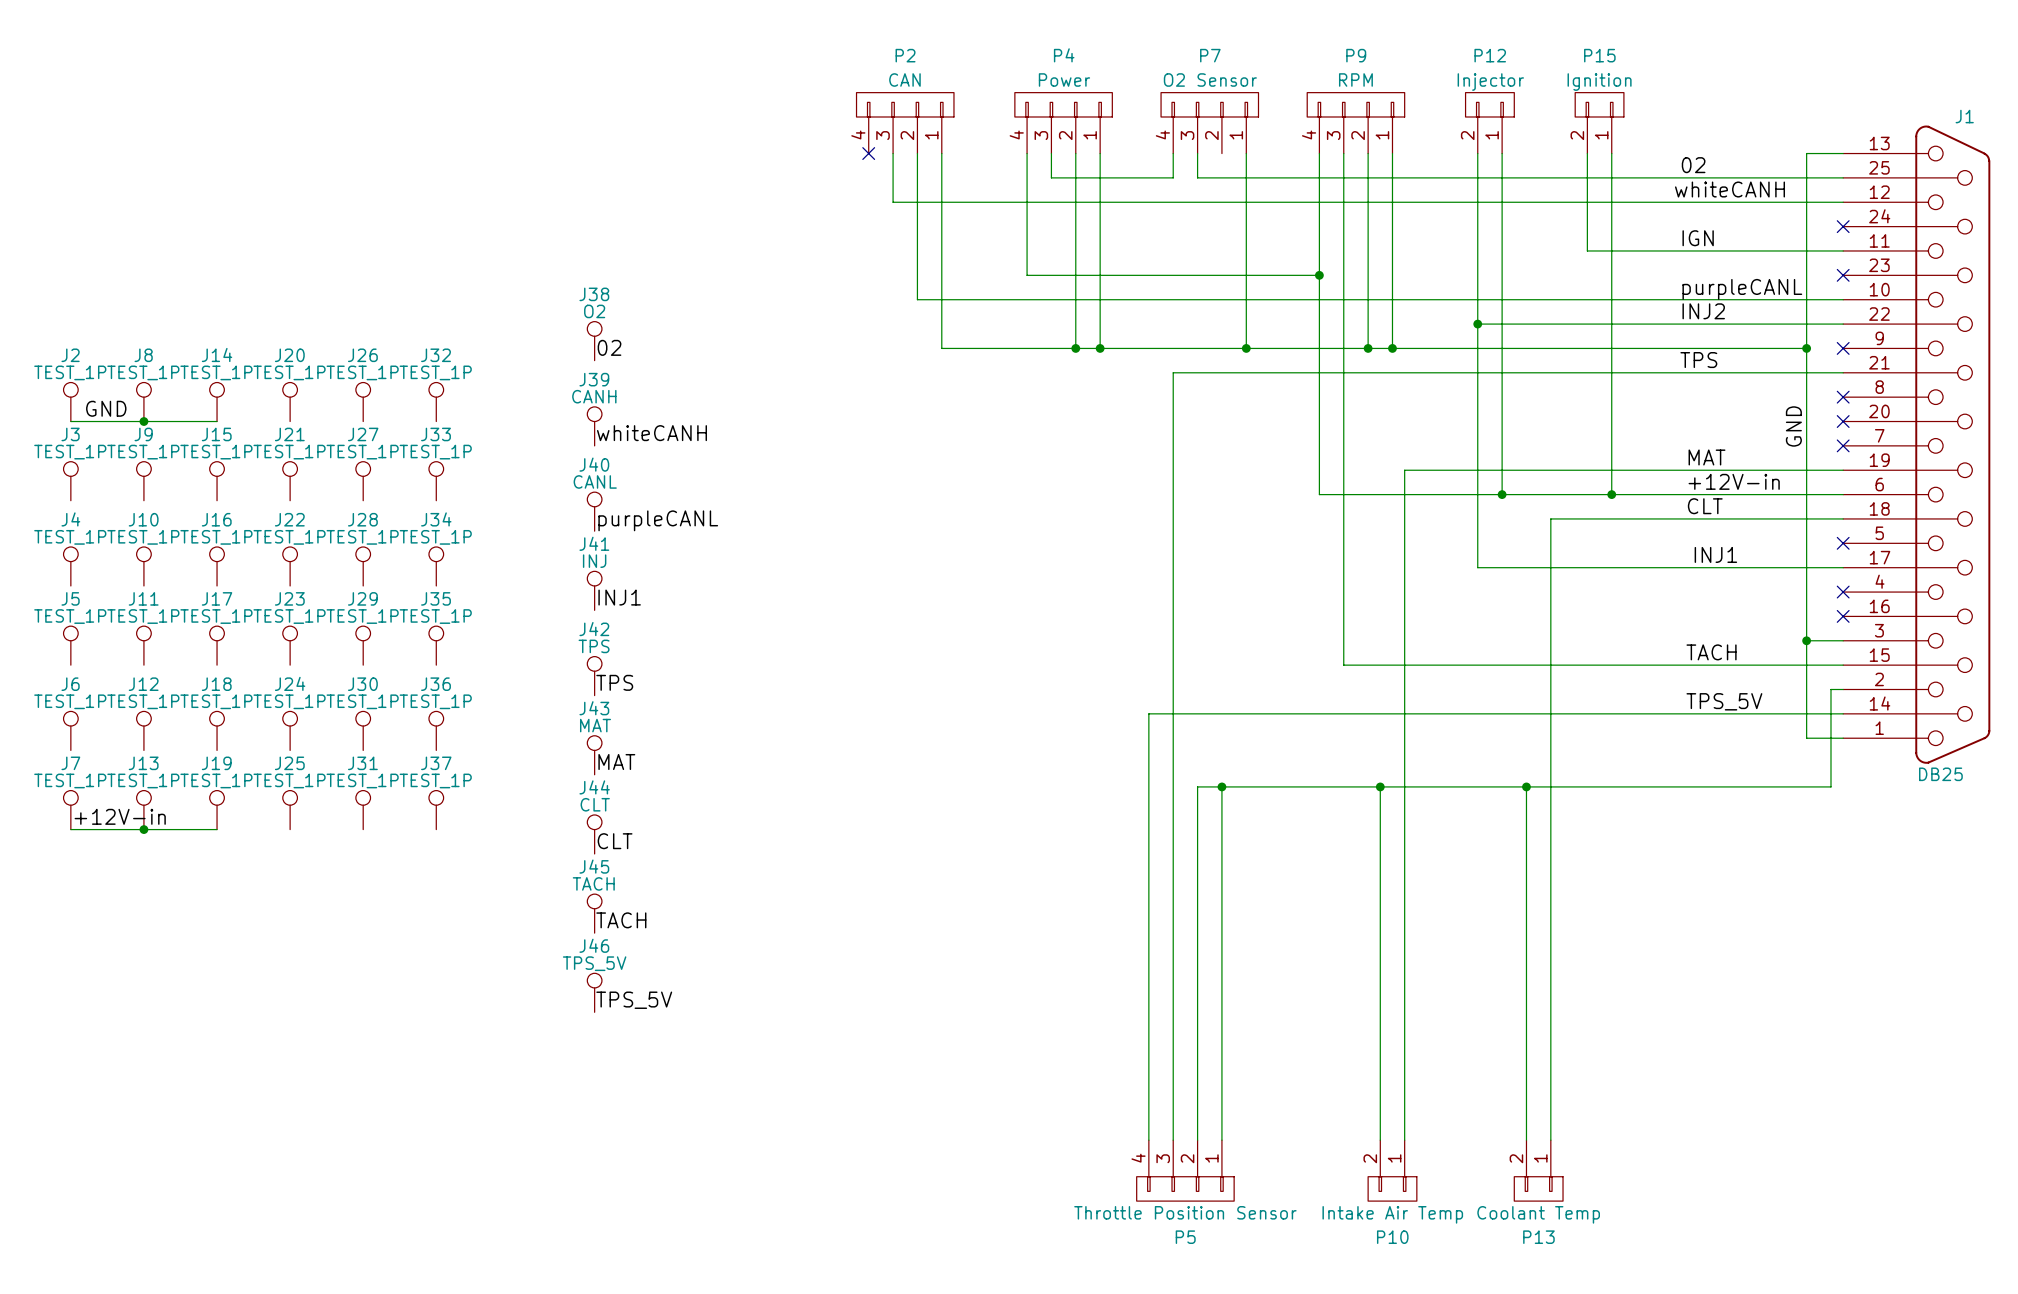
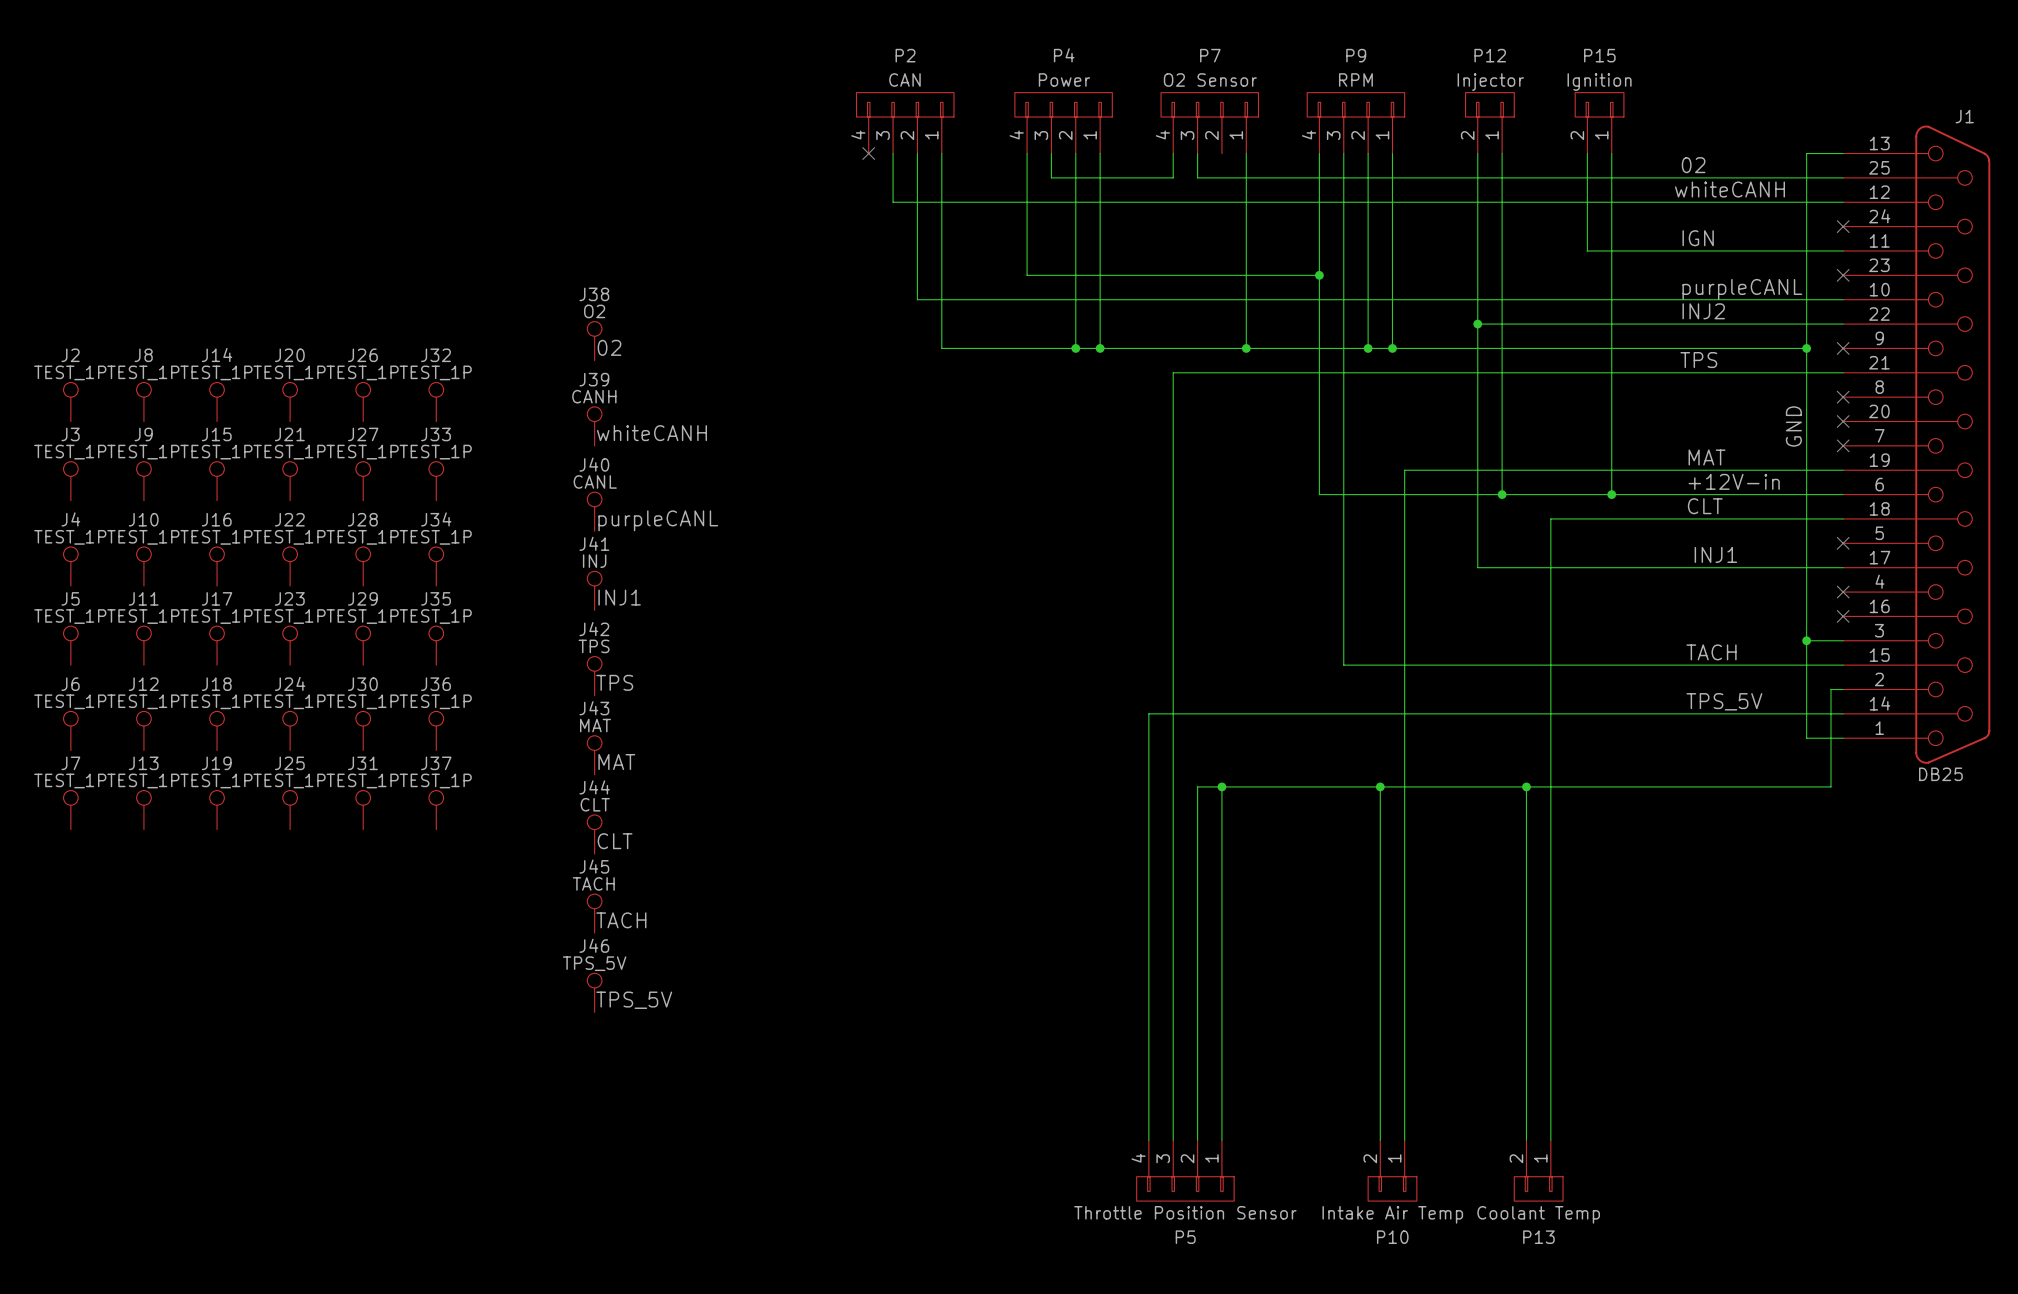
label: GND (106, 408) -> none
wire: (70, 421) (217, 421) -> none
junction: (143, 421) -> none
label: +12V-in (120, 816) -> none
wire: (70, 829) (217, 829) -> none
junction: (143, 829) -> none

